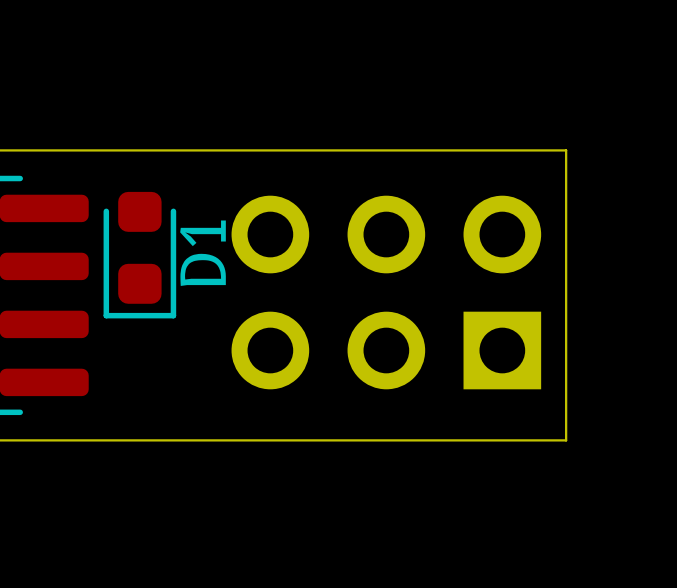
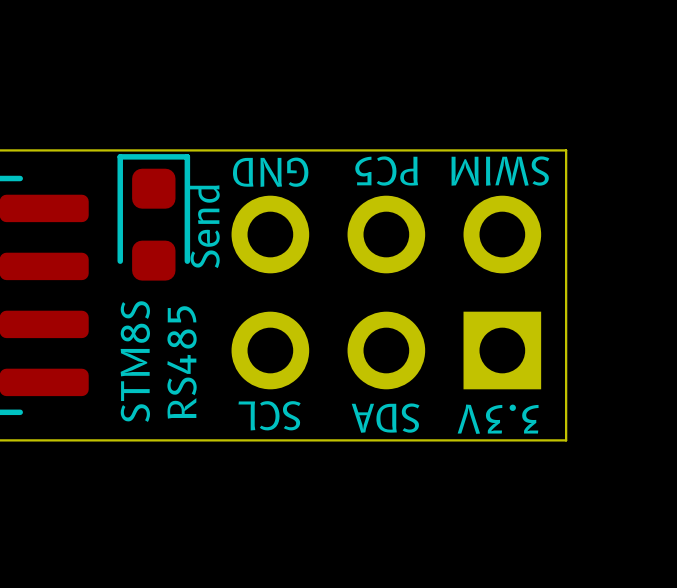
text: none -> PC5 (386, 171)
text: none -> SWIM (500, 171)
text: none -> GND (270, 172)
Send: none -> (153, 217)
D1: (139, 255) -> none
text: none -> STM8S (135, 361)
text: none -> RS485 (182, 362)
text: none -> SCL (269, 415)
text: none -> SDA (385, 418)
text: none -> 3.3V (498, 419)

